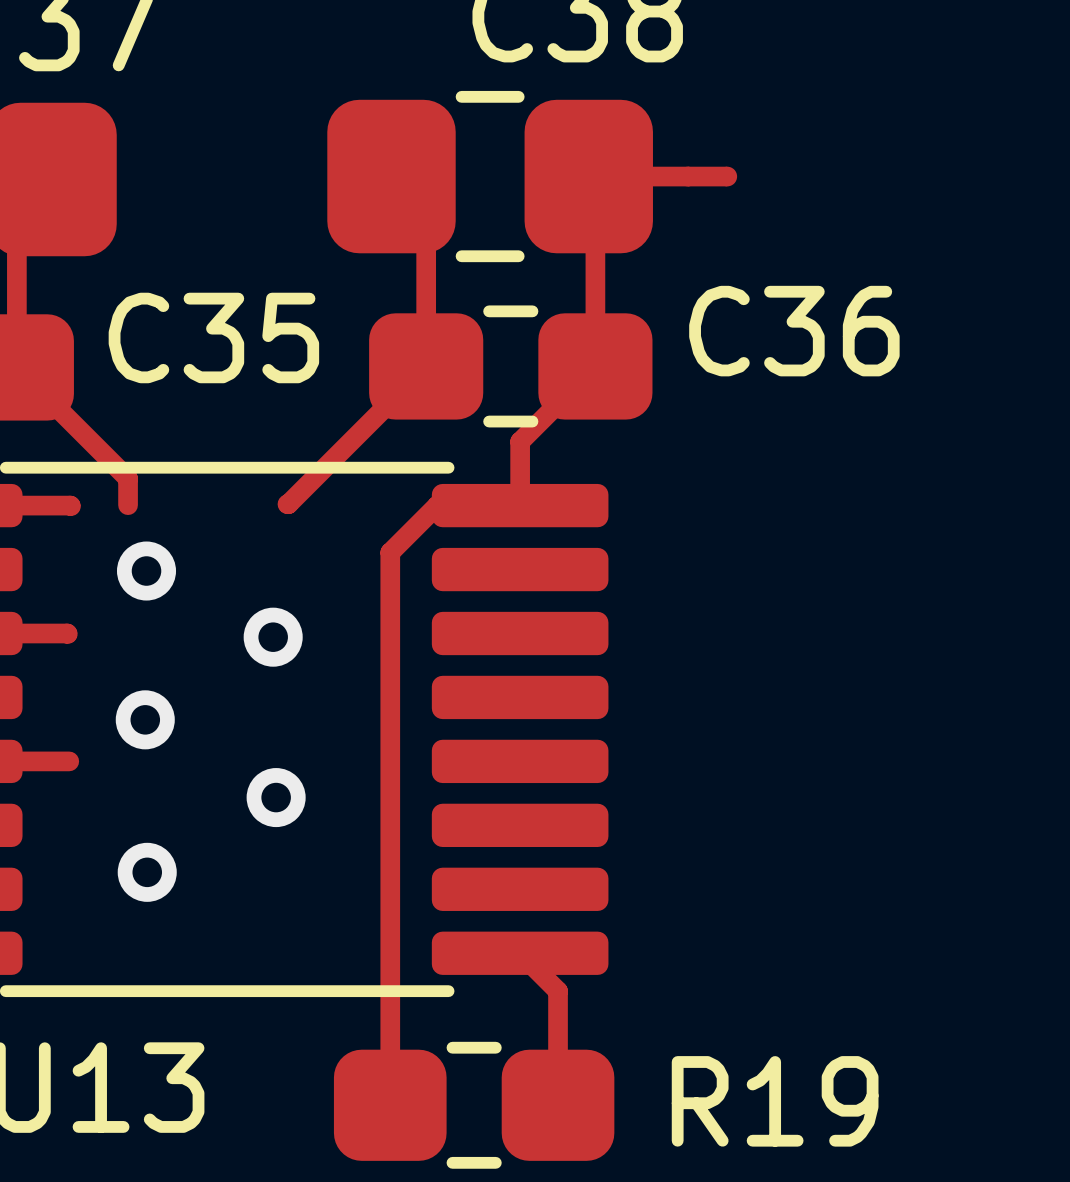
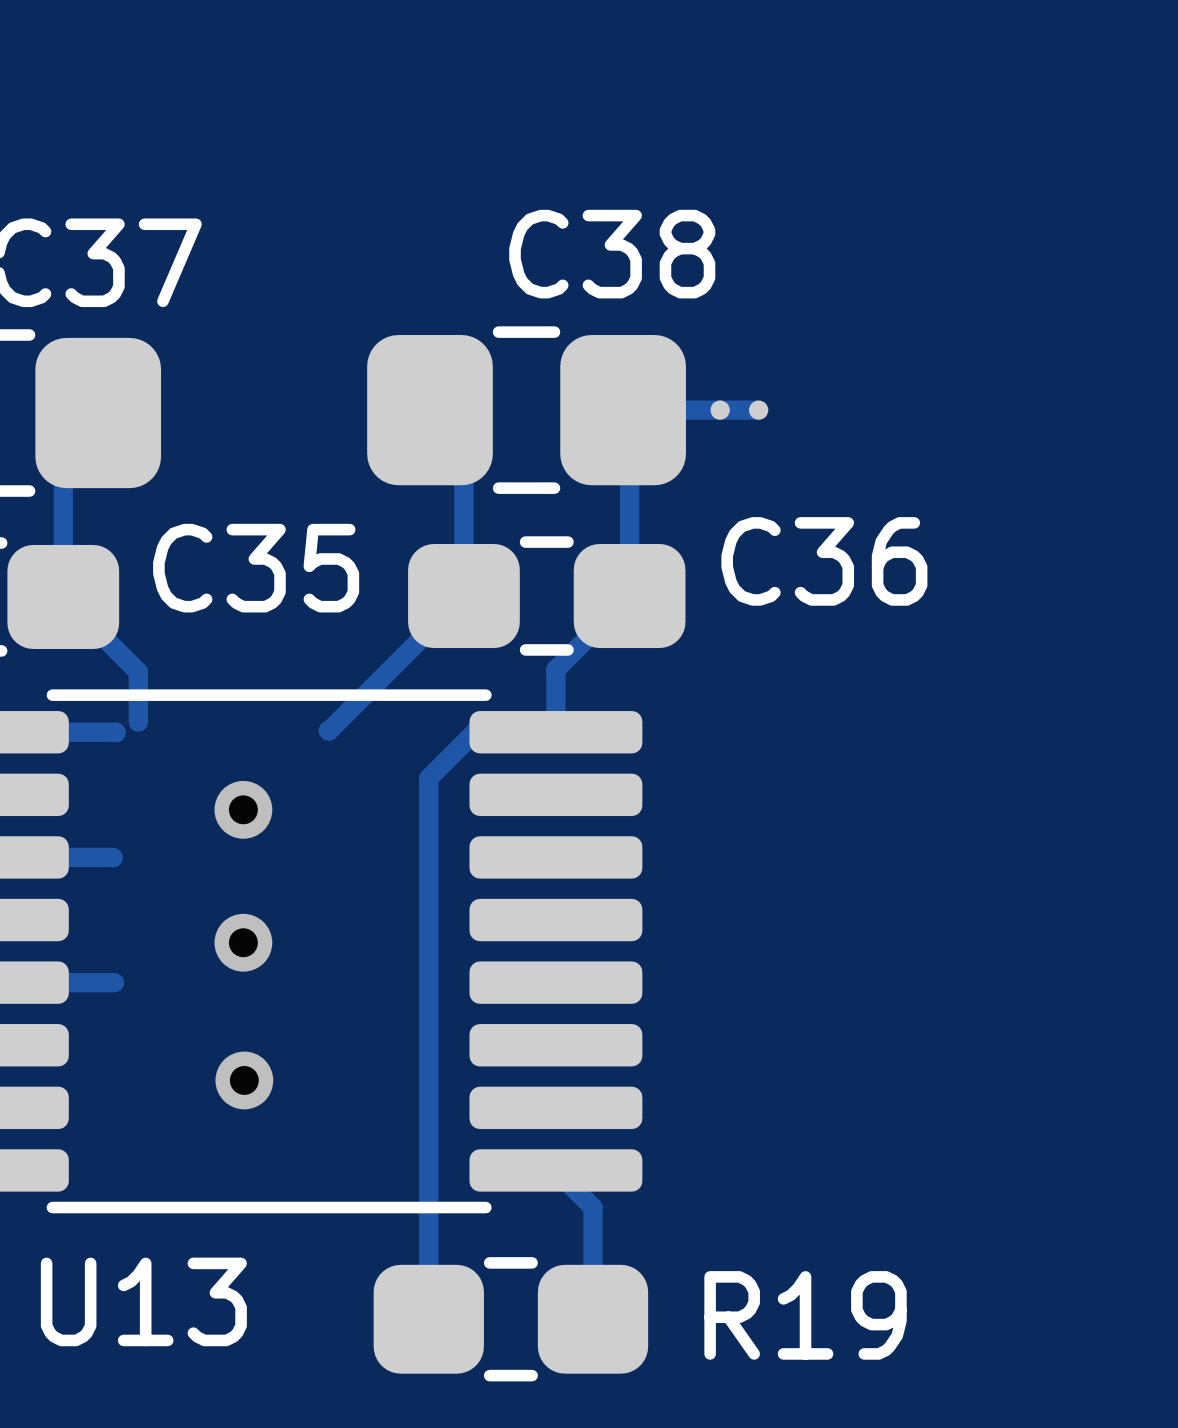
track: (93, 444) (128, 478) (128, 505) -> (138, 672) (138, 722)
via position: (146, 571) -> (243, 809)
via: (273, 637) -> none
via position: (145, 719) -> (243, 942)
via: (276, 797) -> none
via position: (147, 872) -> (244, 1080)

